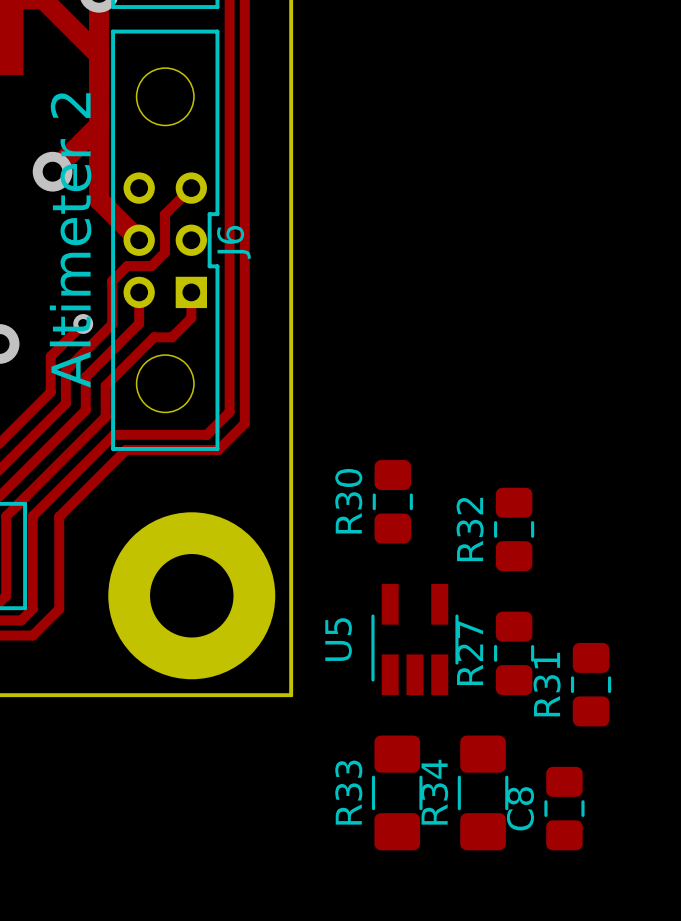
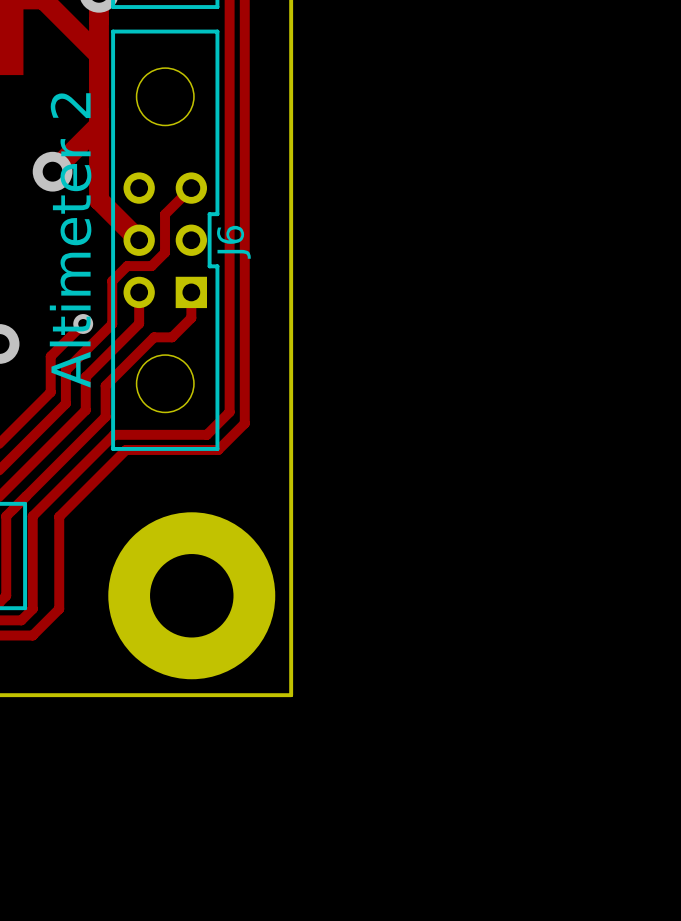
R30: (392, 501) -> none
R32: (514, 529) -> none
U5: (414, 639) -> none
R27: (514, 653) -> none
R31: (591, 684) -> none
R33: (397, 792) -> none
R34: (483, 792) -> none
C8: (564, 808) -> none

